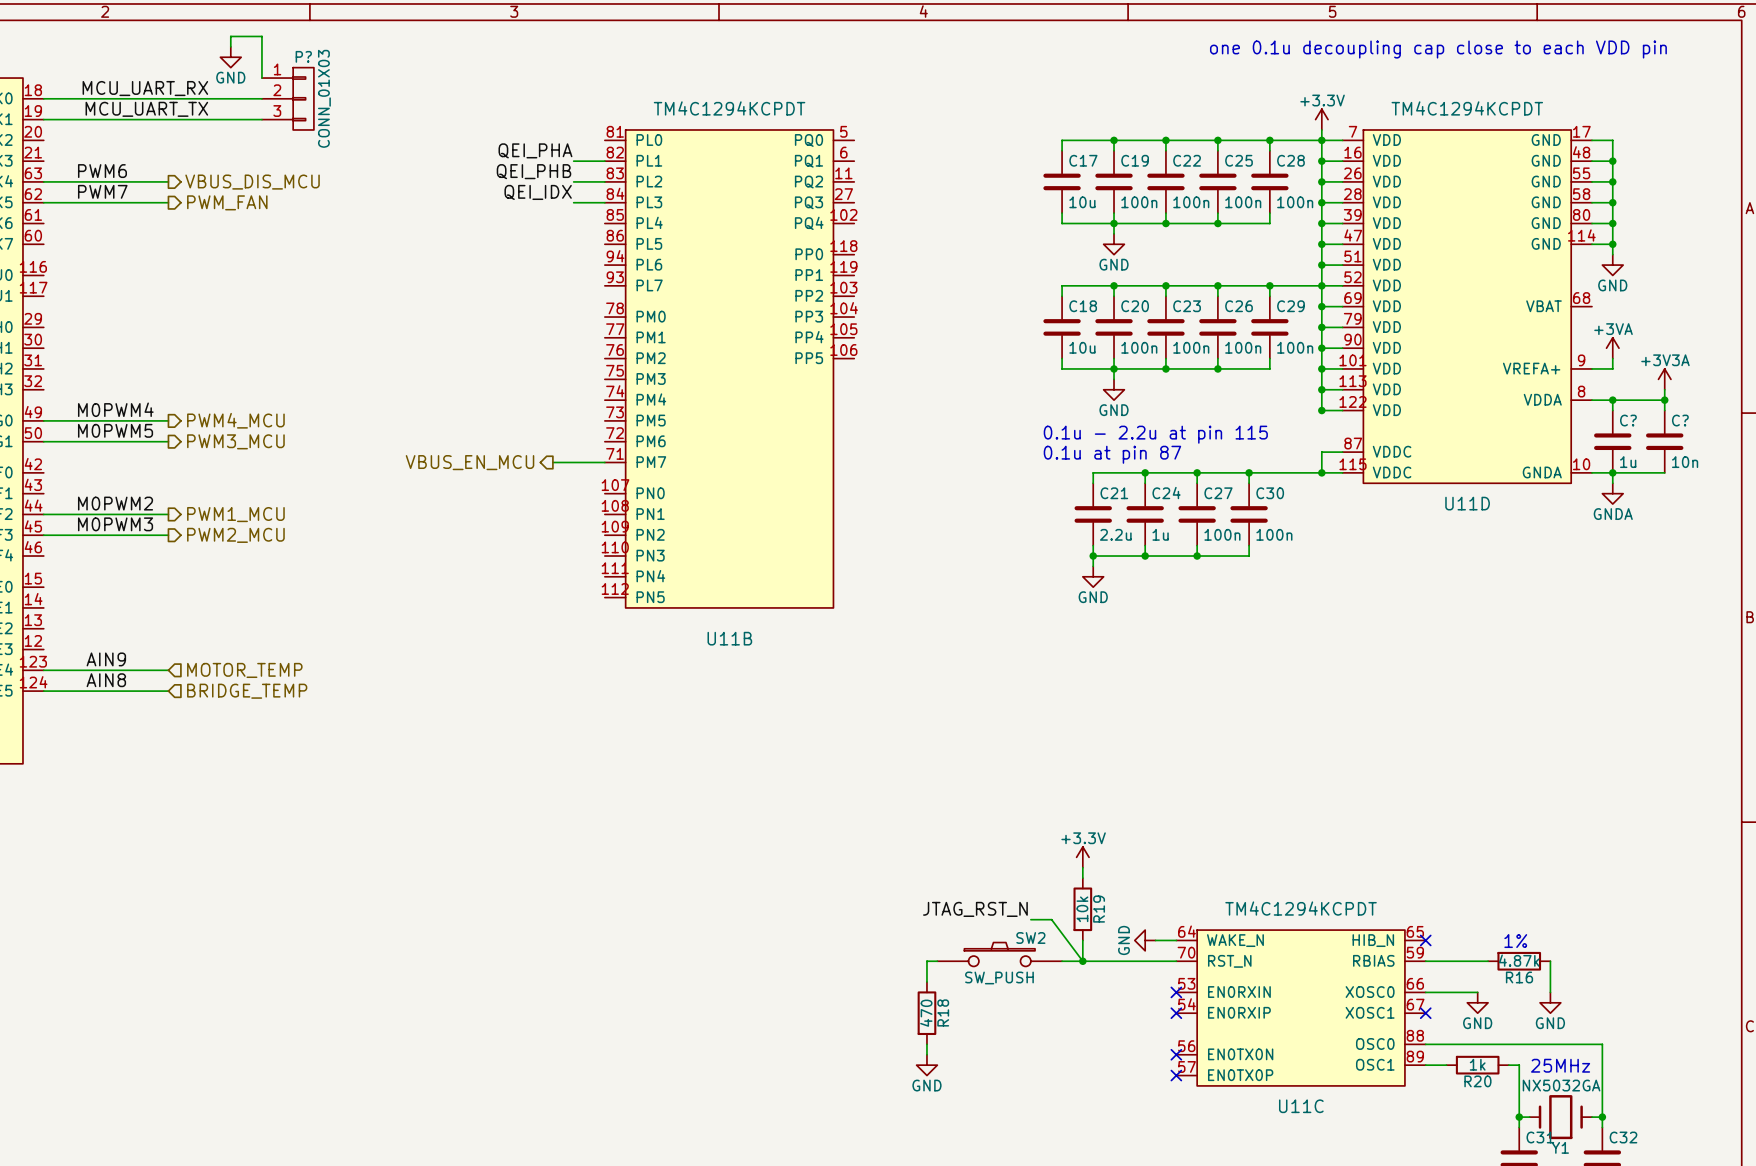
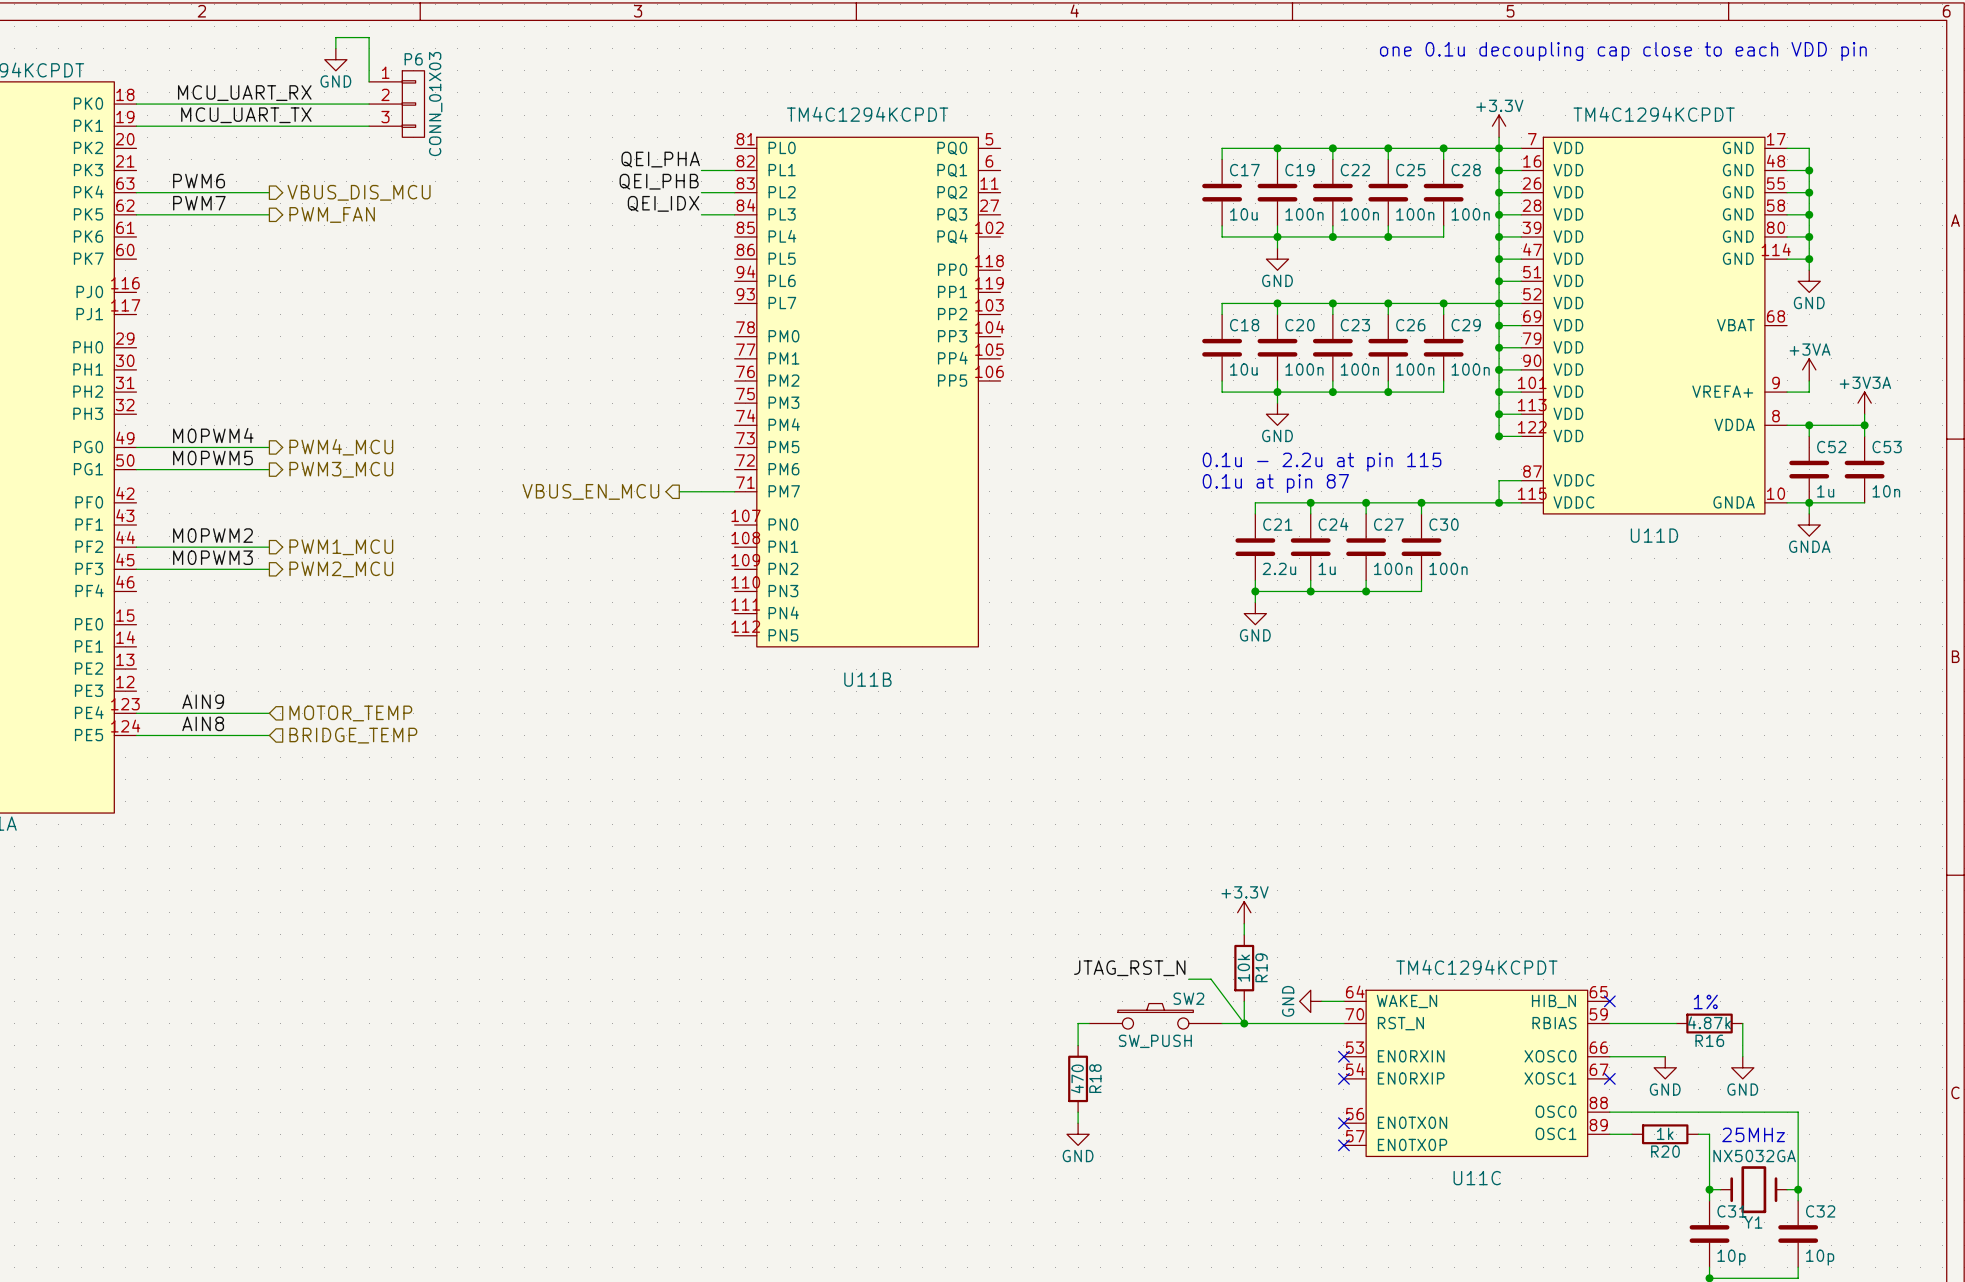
P? name: P? (303, 56) -> P6 (413, 59)
C? name: C? (1628, 420) -> C52 (1831, 447)
C? name: C? (1680, 420) -> C53 (1887, 447)

